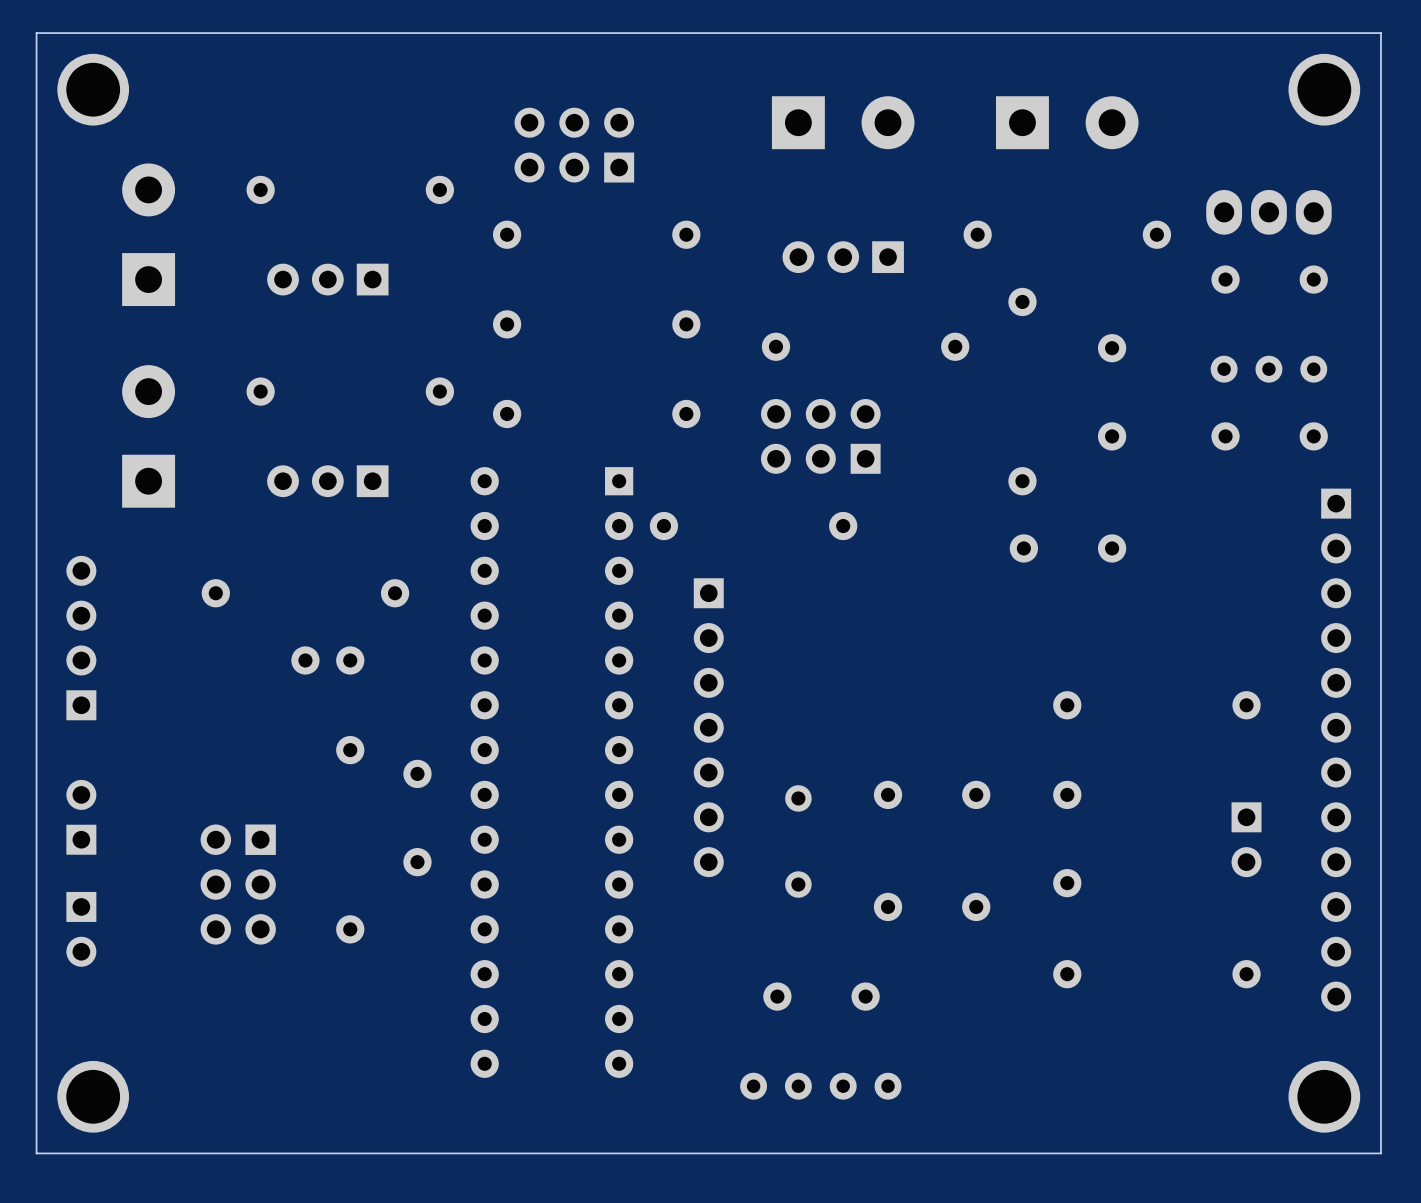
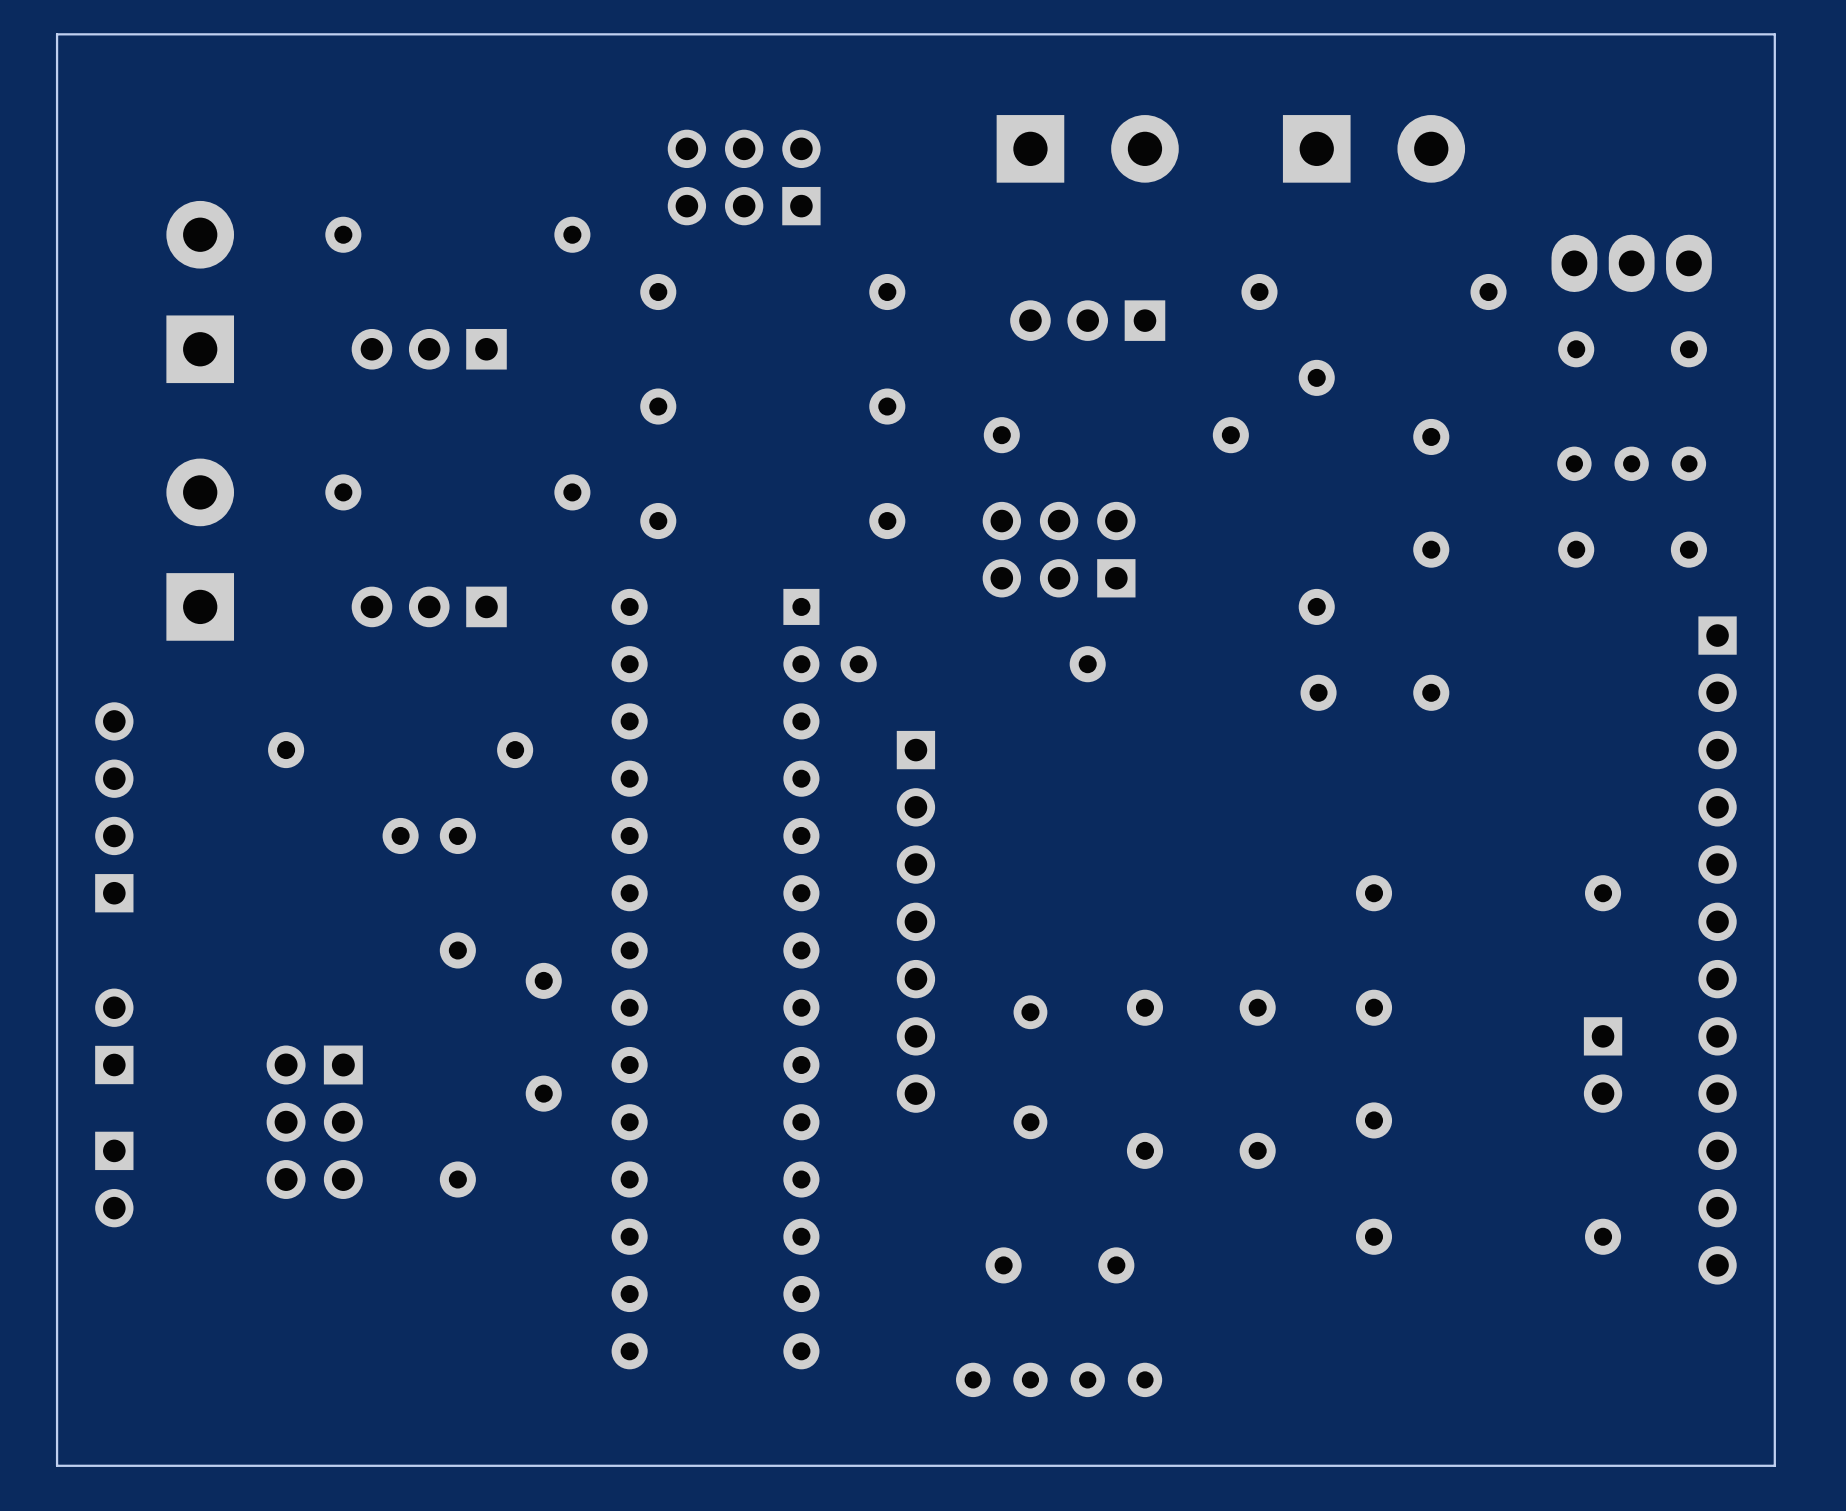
part: (93, 89) -> none
part: (1324, 89) -> none
part: (93, 1096) -> none
part: (1324, 1096) -> none

